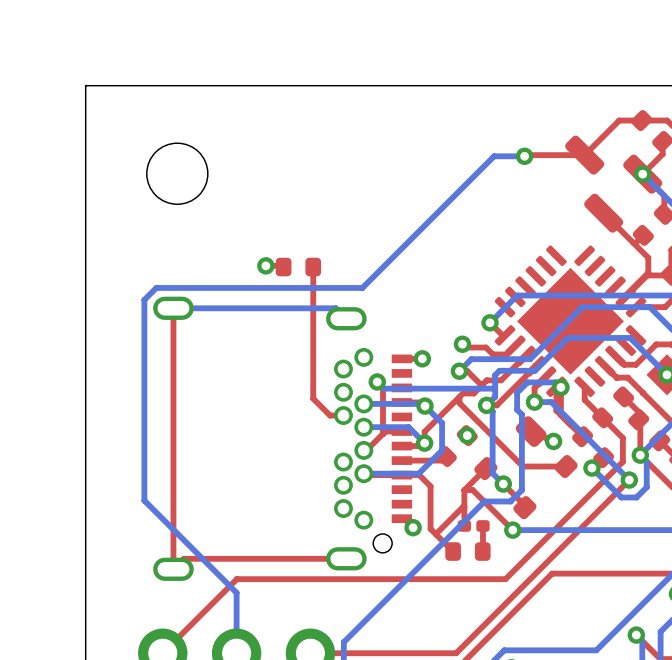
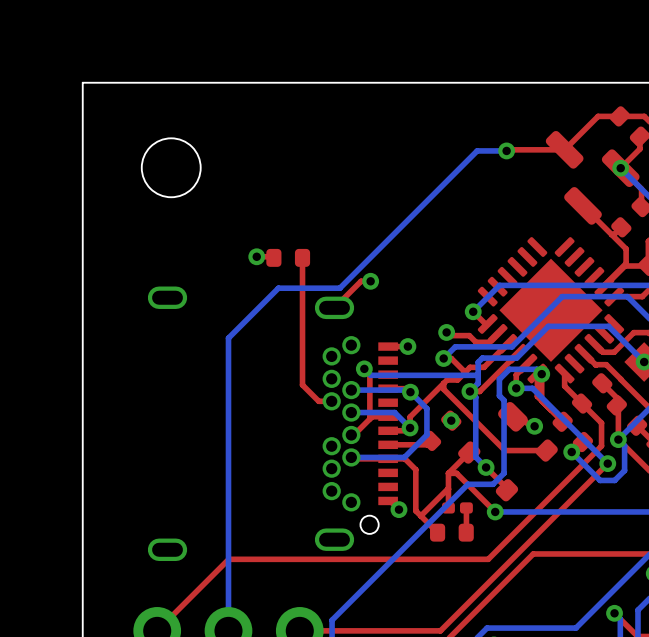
bottom track: (362, 287) (156, 287) (144, 299) (144, 500) (236, 592) -> (350, 278) (339, 288) (278, 288) (228, 338) (228, 572)
top track: none -> (370, 281) (361, 281) (334, 307)
via: none -> (370, 281)
top track: (173, 308) (173, 569) (183, 558) (346, 558) -> none
bottom track: (173, 308) (335, 308) (346, 318) -> none

